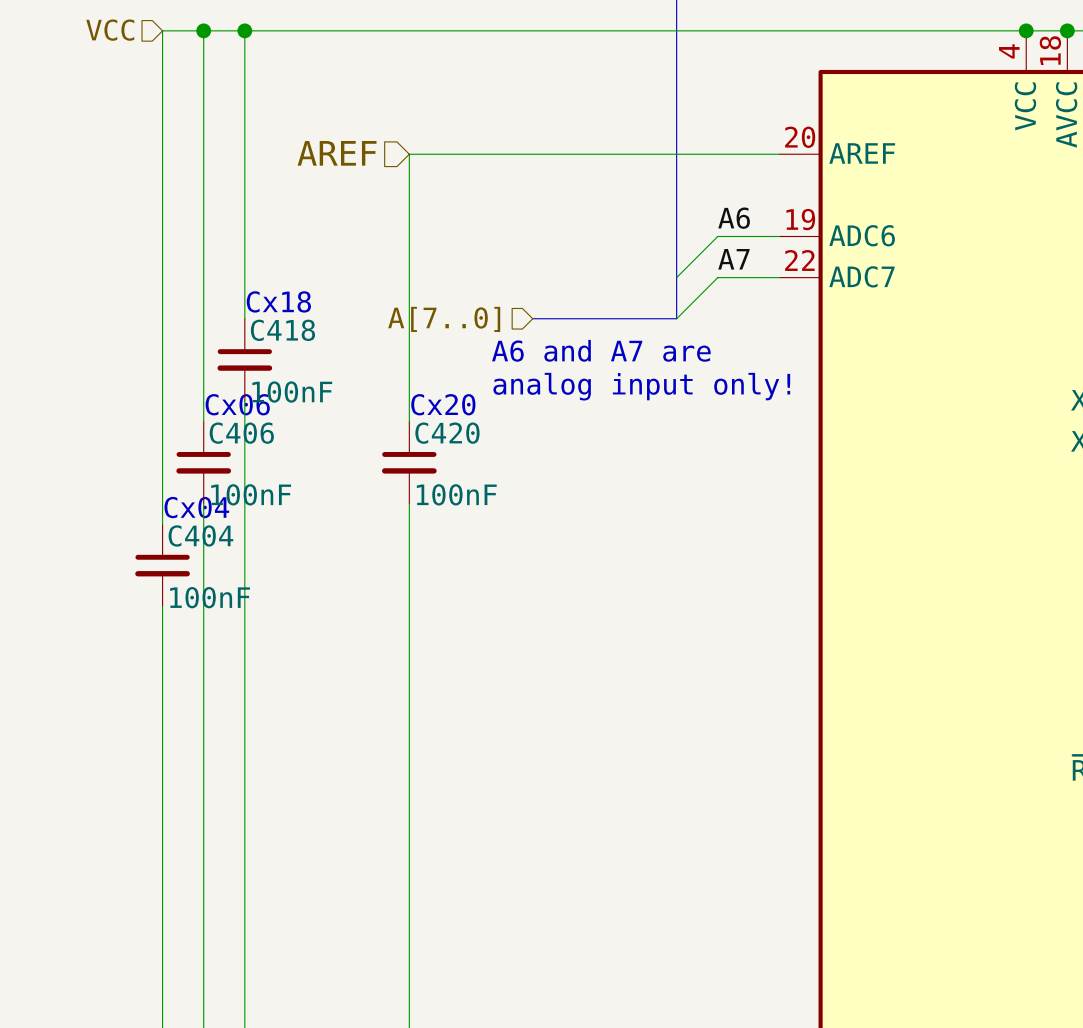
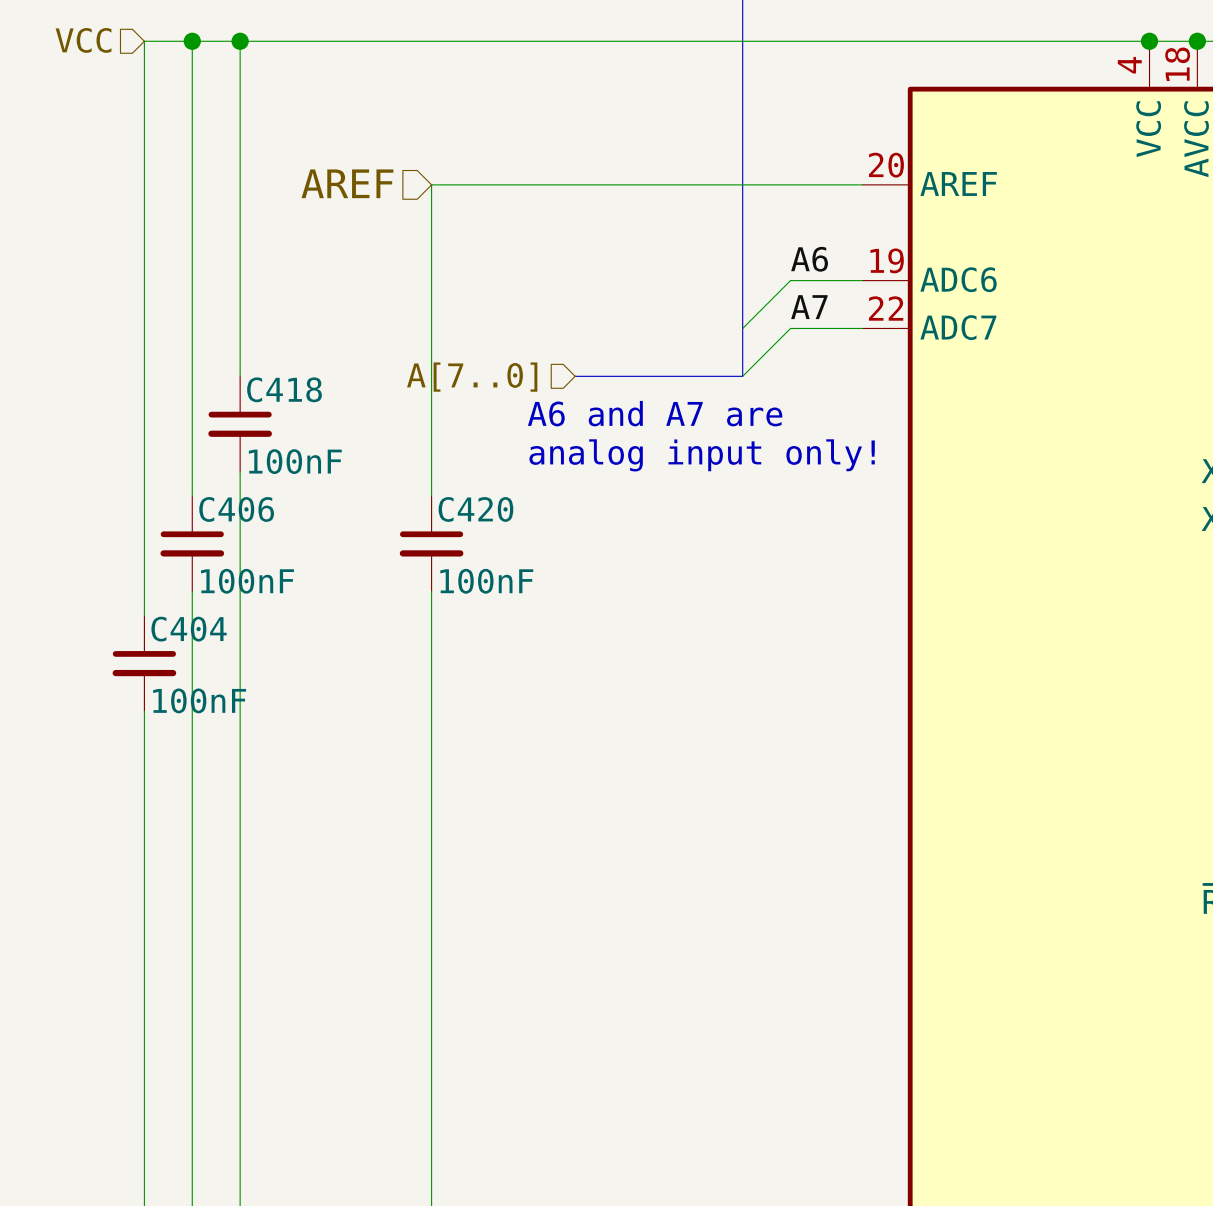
text: Cx18 (278, 301) -> none
text: Cx06 (237, 404) -> none
text: Cx20 (443, 404) -> none
text: Cx04 (196, 507) -> none

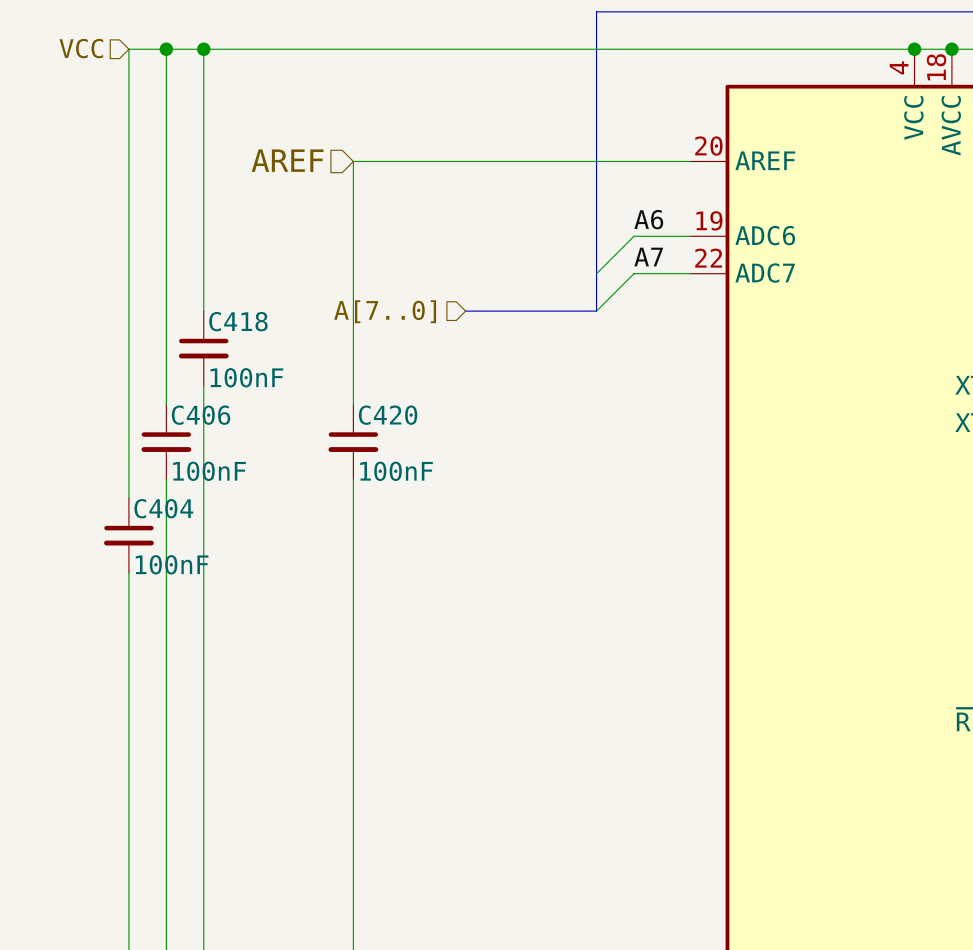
text: A6 and A7 are (655, 413) -> none
text: analog input only! (702, 455) -> none

